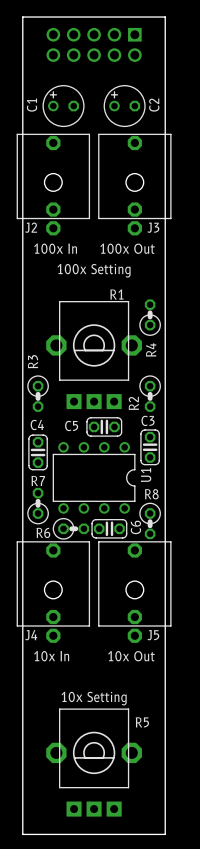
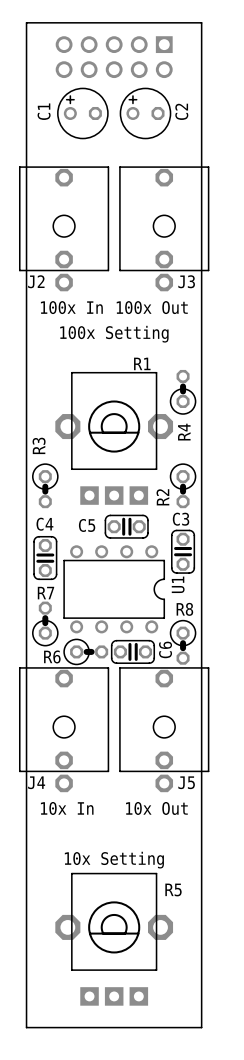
C1 position: (63, 106) -> (82, 113)
C2 position: (124, 106) -> (145, 113)

